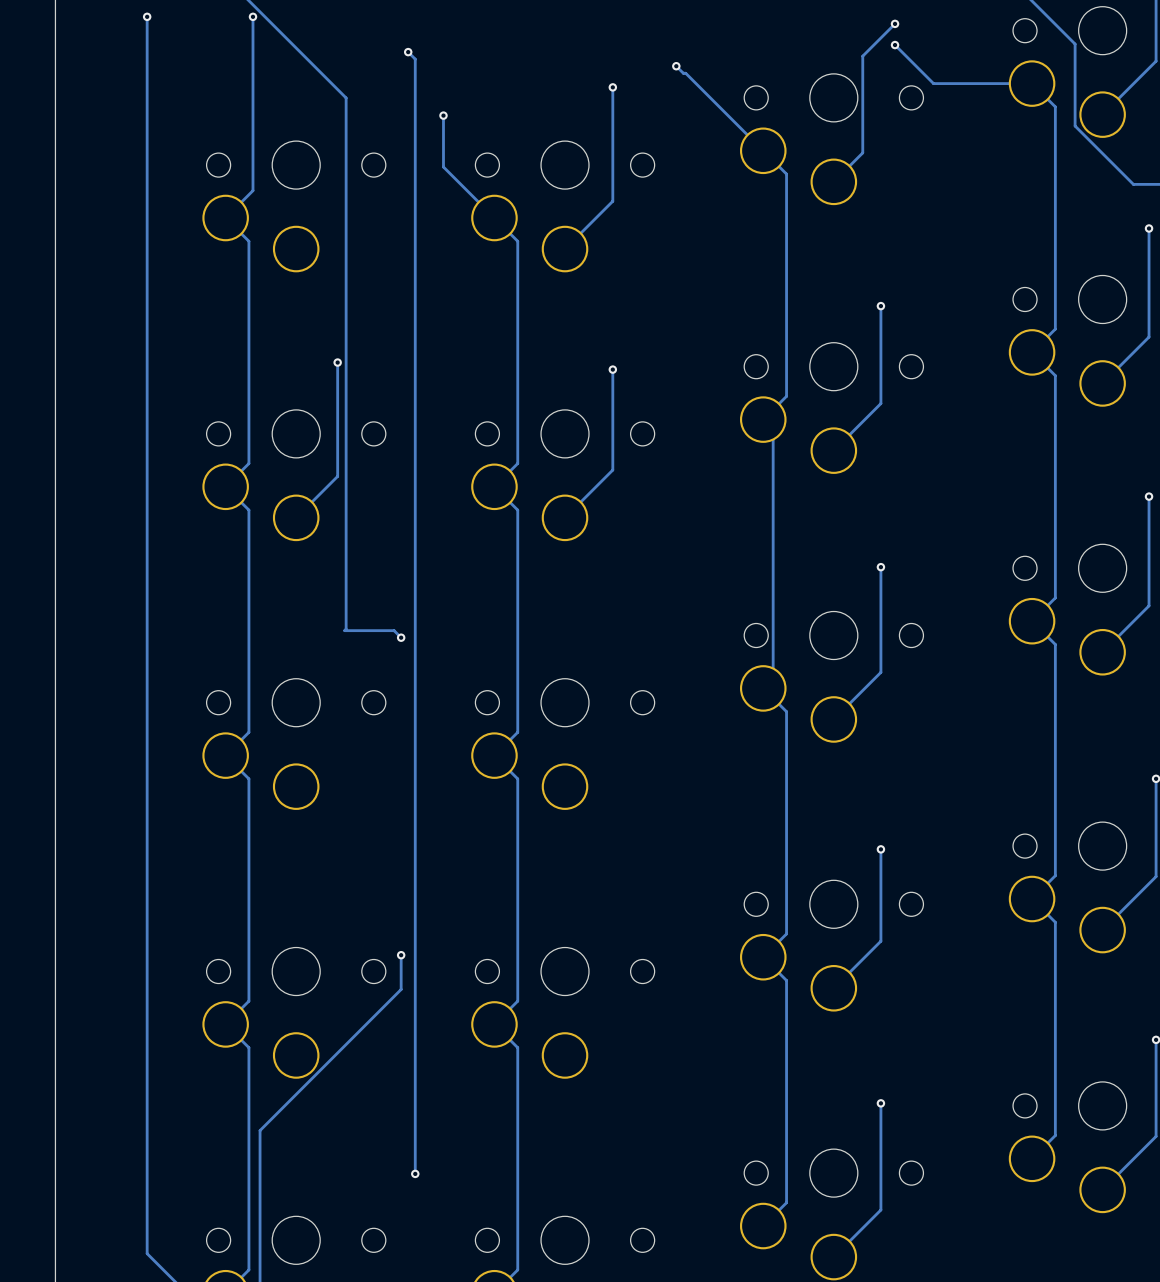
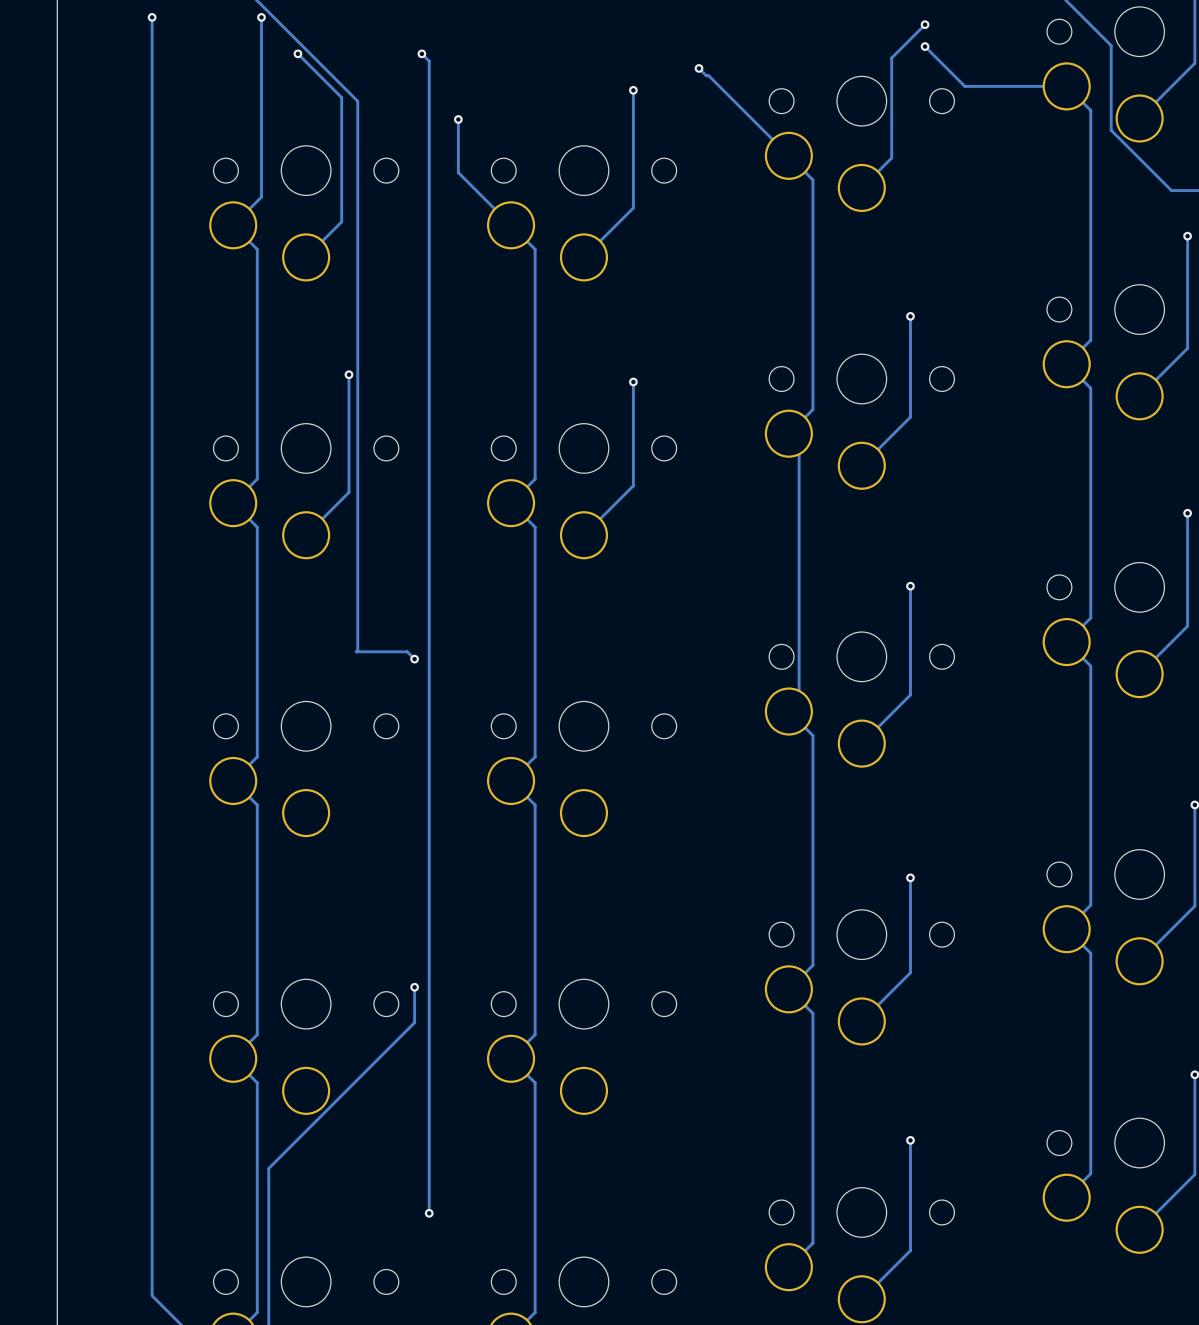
track: none -> (297, 53) (341, 97) (341, 221) (306, 257)
via: none -> (297, 53)

